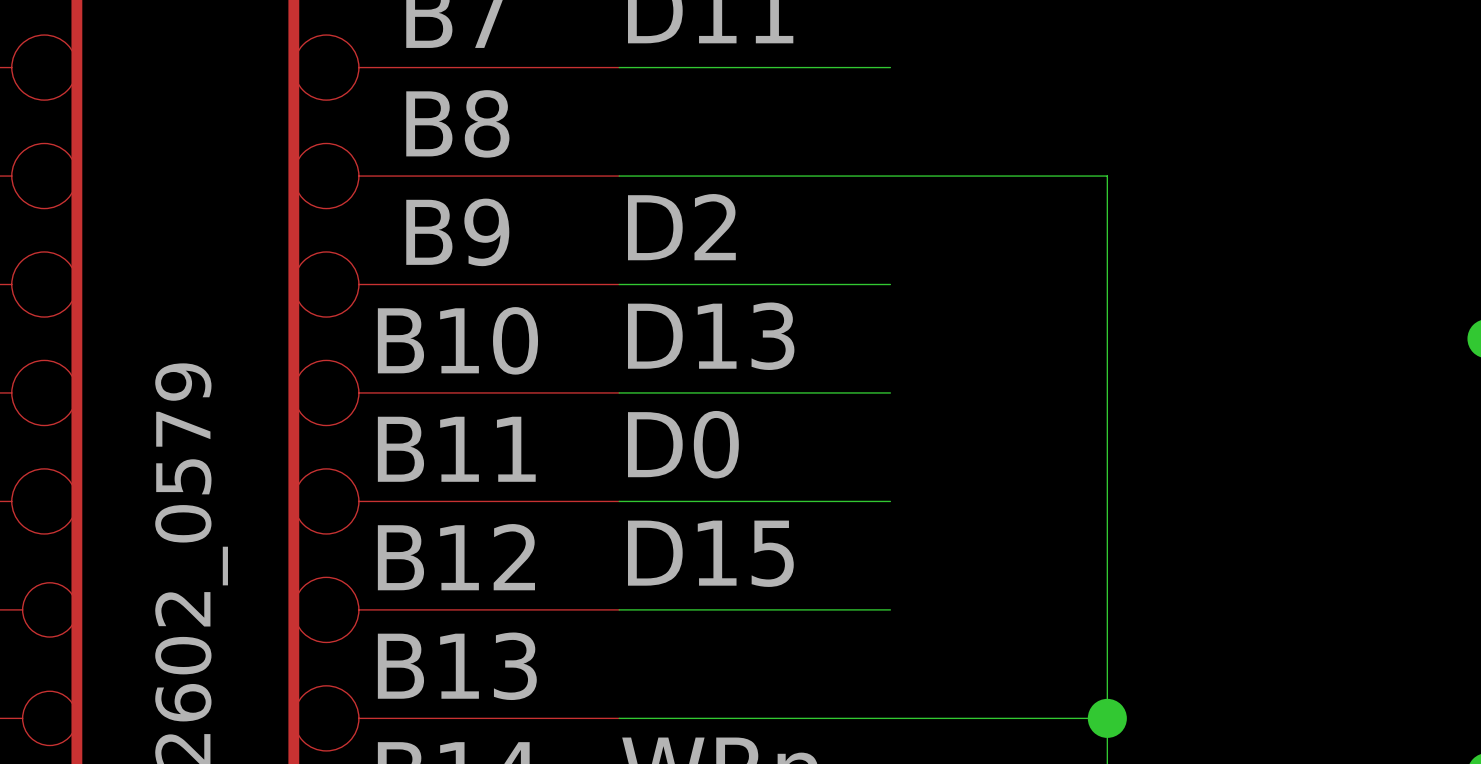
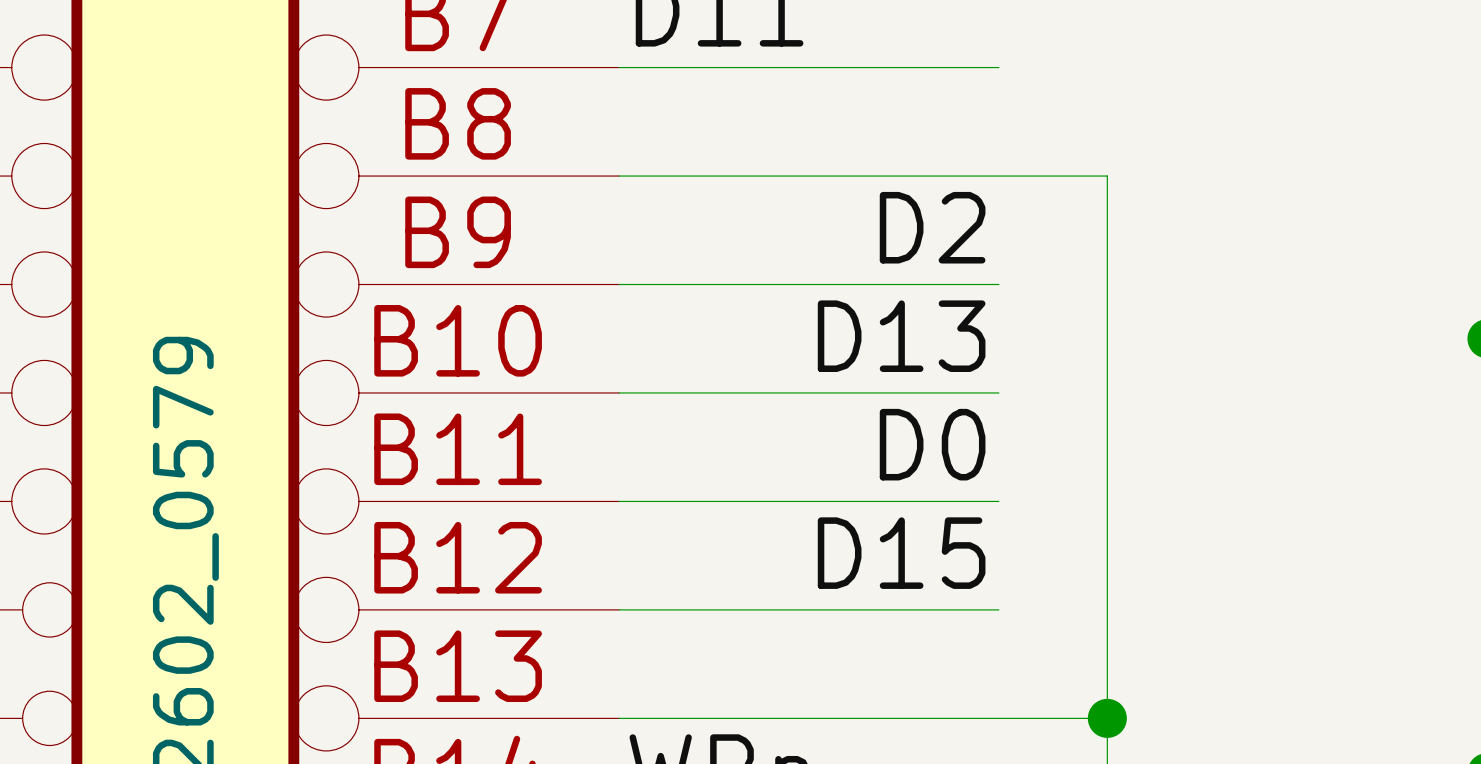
wire: none -> (890, 67) (998, 67)
label position: D2 (681, 227) -> D2 (932, 227)
wire: none -> (890, 284) (998, 284)
label position: D13 (711, 336) -> D13 (901, 336)
wire: none -> (890, 392) (998, 392)
label position: D0 (683, 444) -> D0 (932, 444)
wire: none -> (890, 501) (998, 501)
label position: D15 (710, 553) -> D15 (901, 553)
wire: none -> (890, 609) (998, 609)

